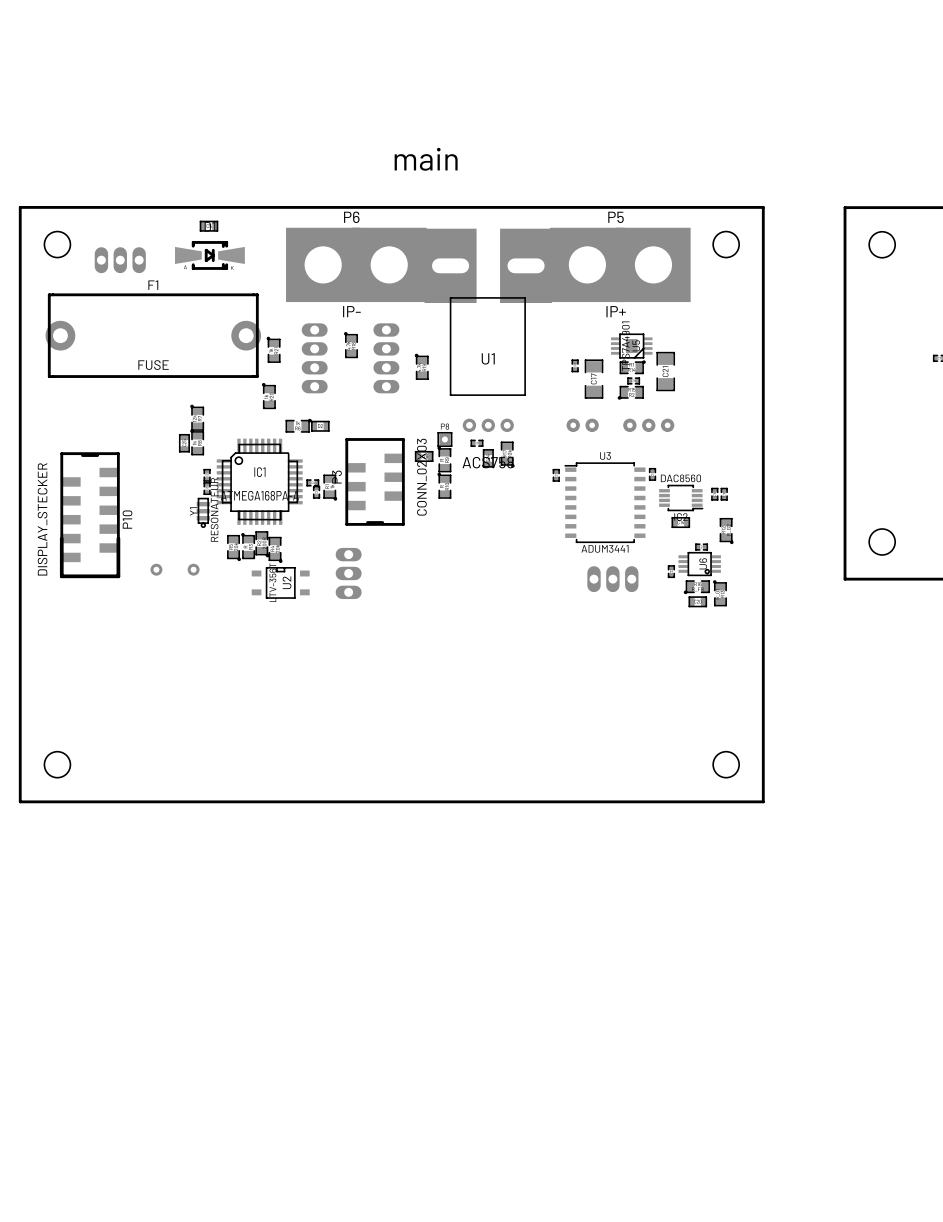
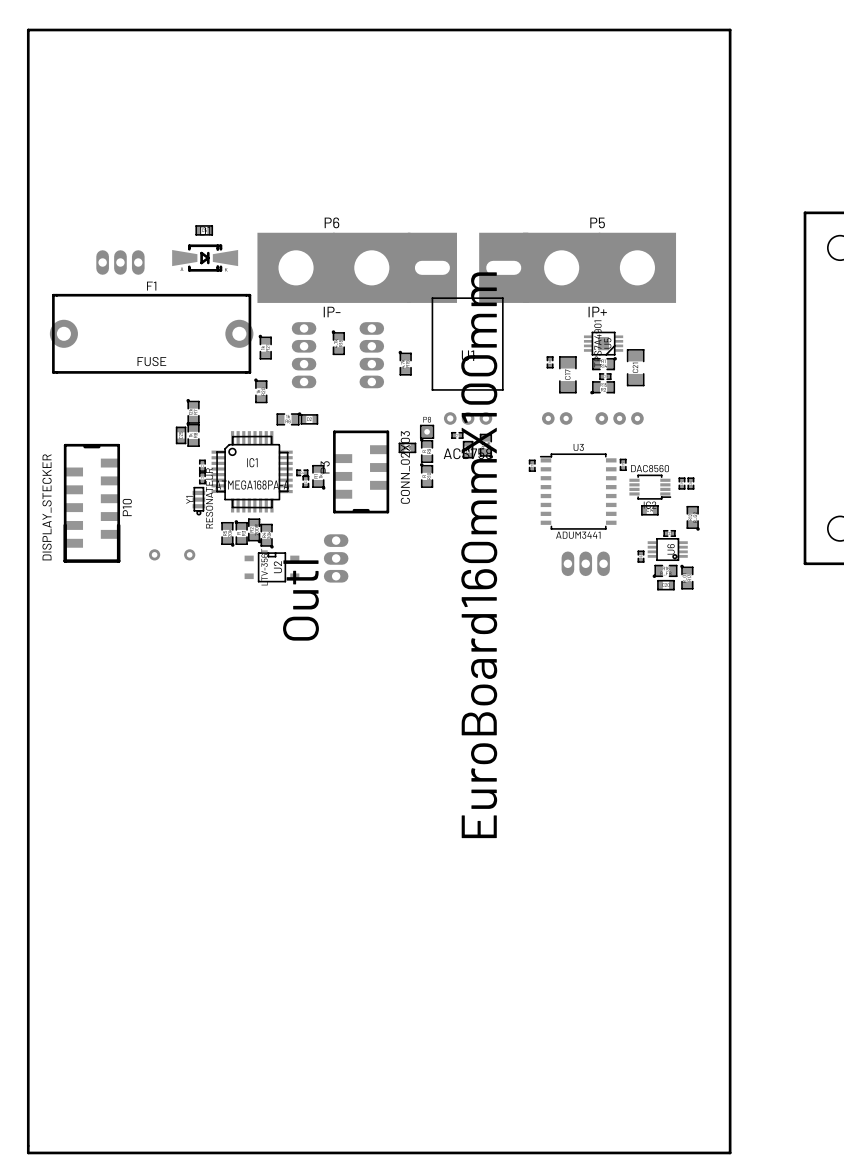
P6 footprint: [286, 227, 427, 303] -> [257, 232, 411, 303]
P5 footprint: [550, 227, 691, 303] -> [523, 232, 677, 303]
main: (391, 504) -> none
Outl: none -> EuroBoard160mmX100mm (379, 591)

